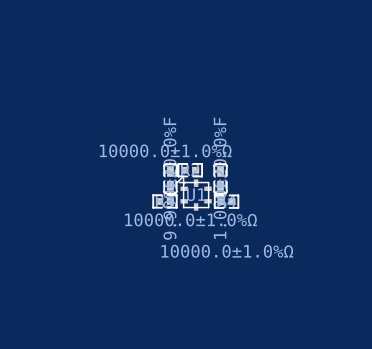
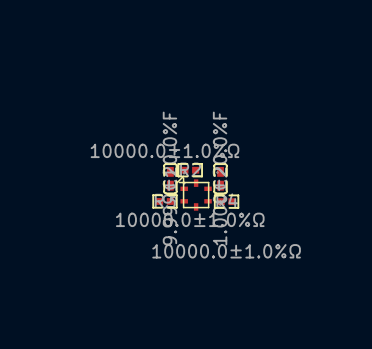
U1 name: U1 (196, 194) -> none

